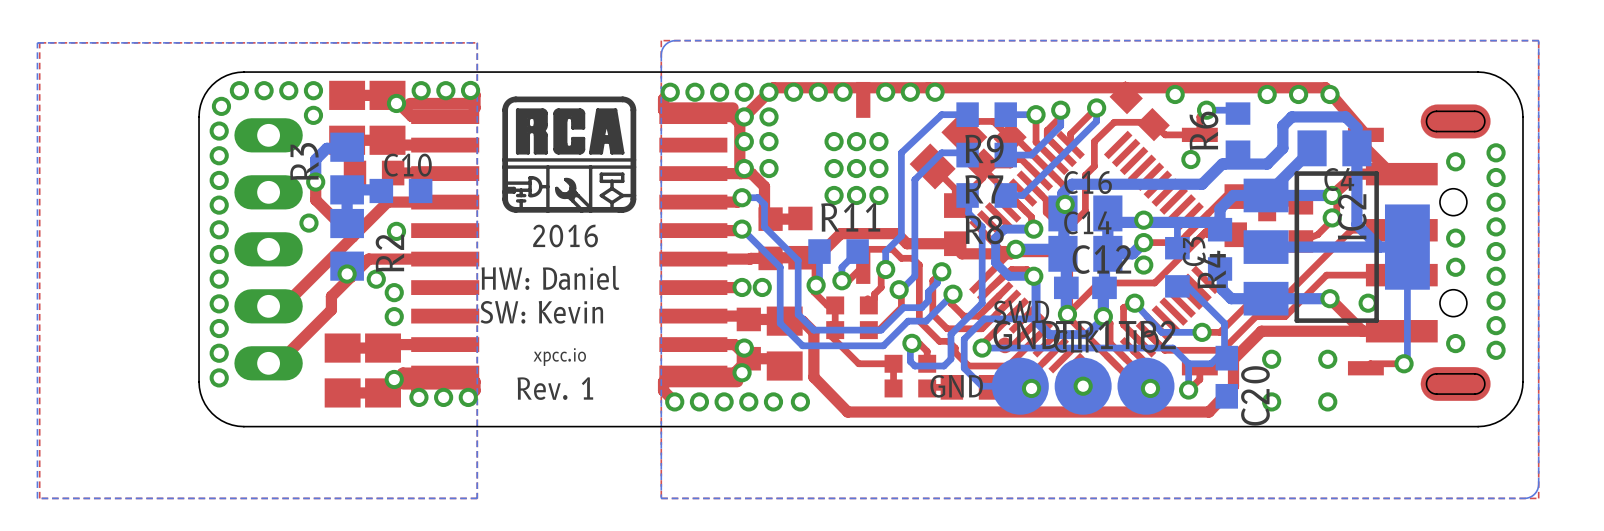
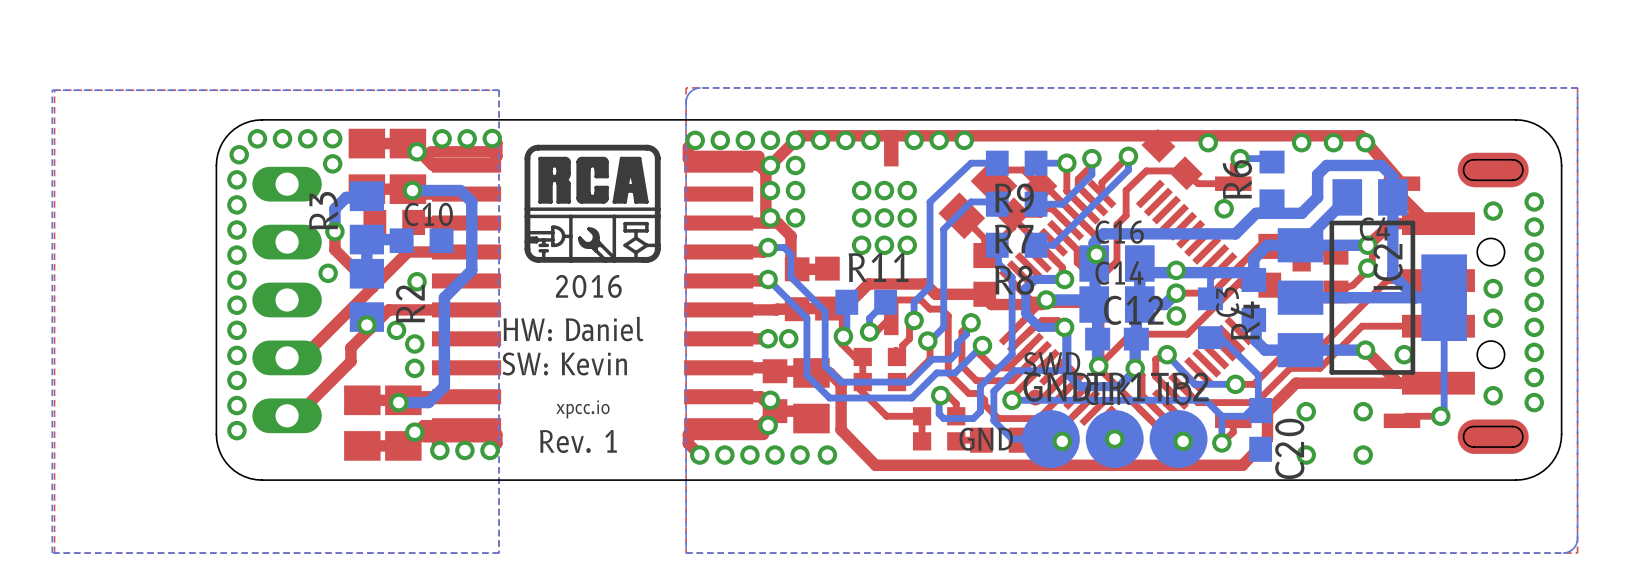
bottom track: none -> (412, 190) (460, 190) (471, 201) (471, 270) (444, 297) (444, 386) (428, 402) (398, 402)
via: none -> (412, 190)
via: none -> (398, 402)

